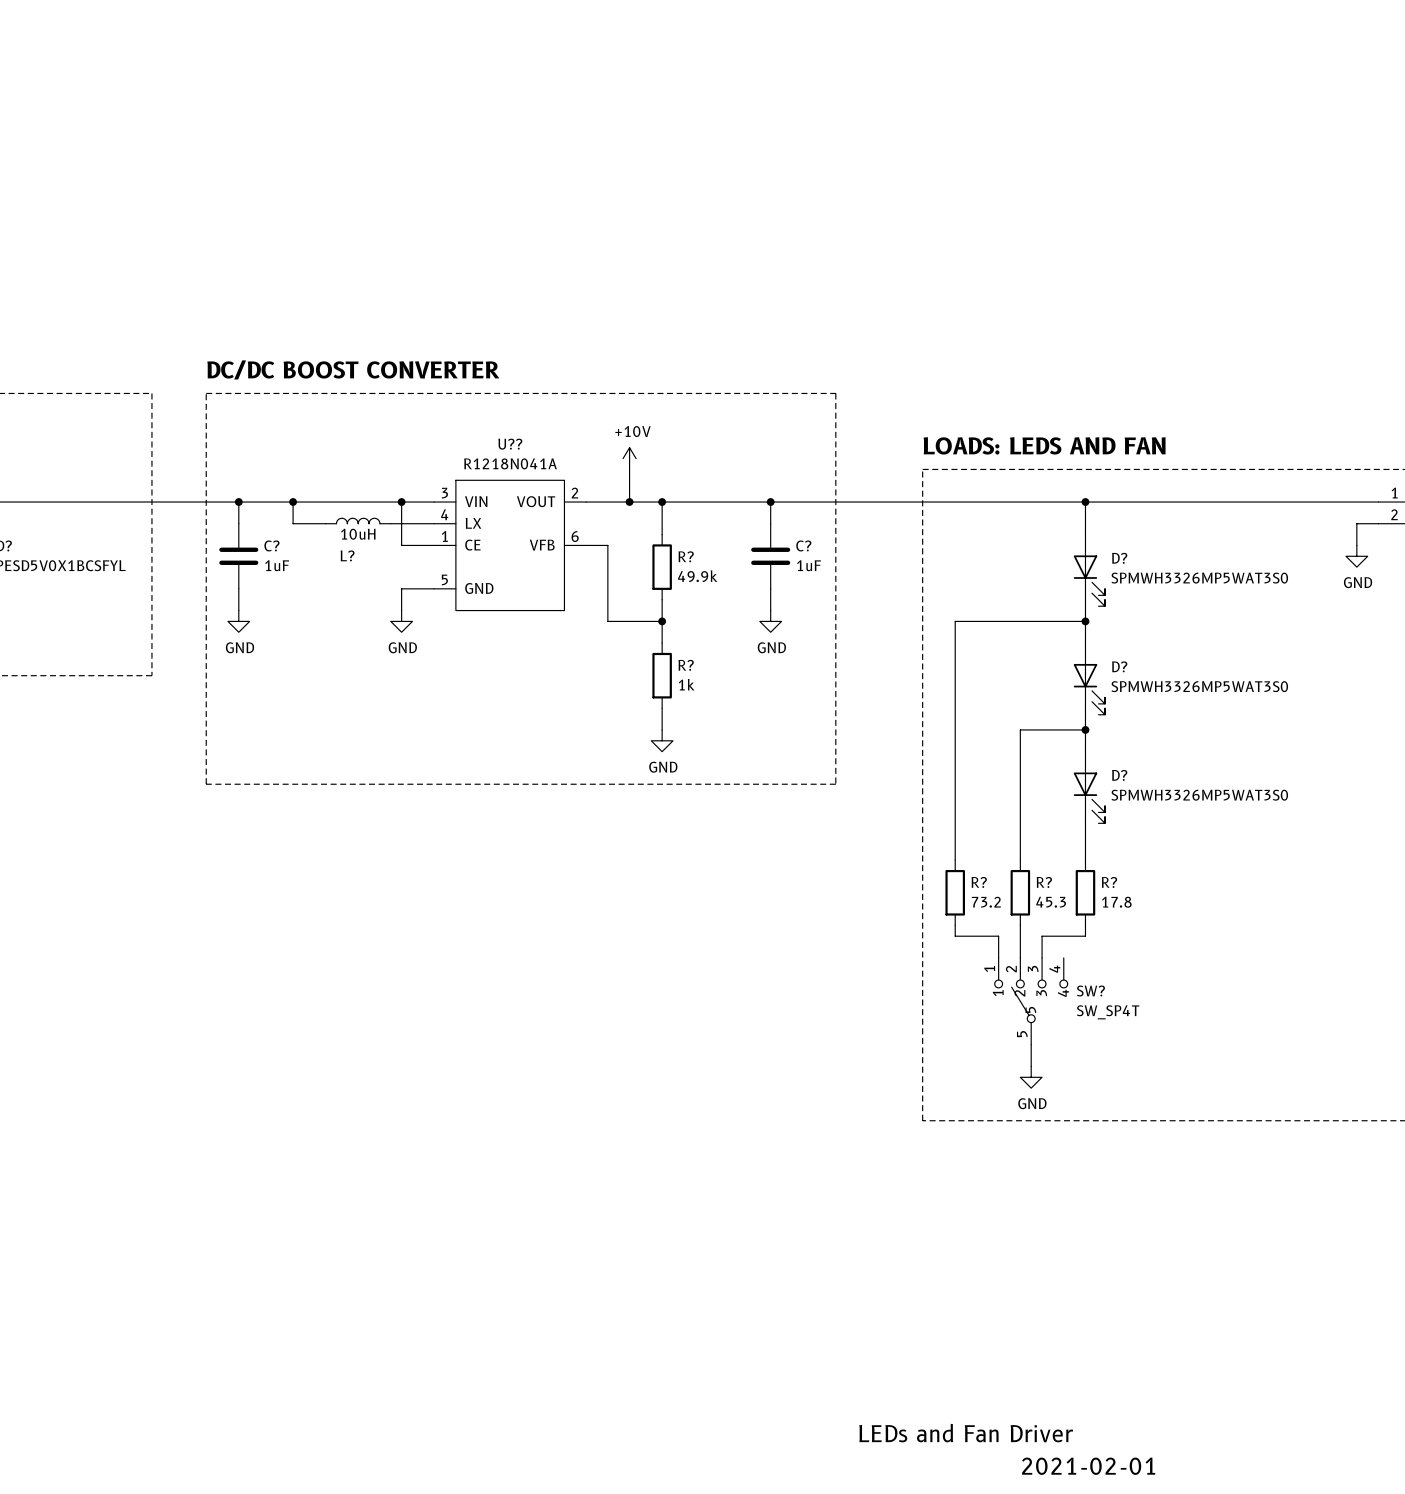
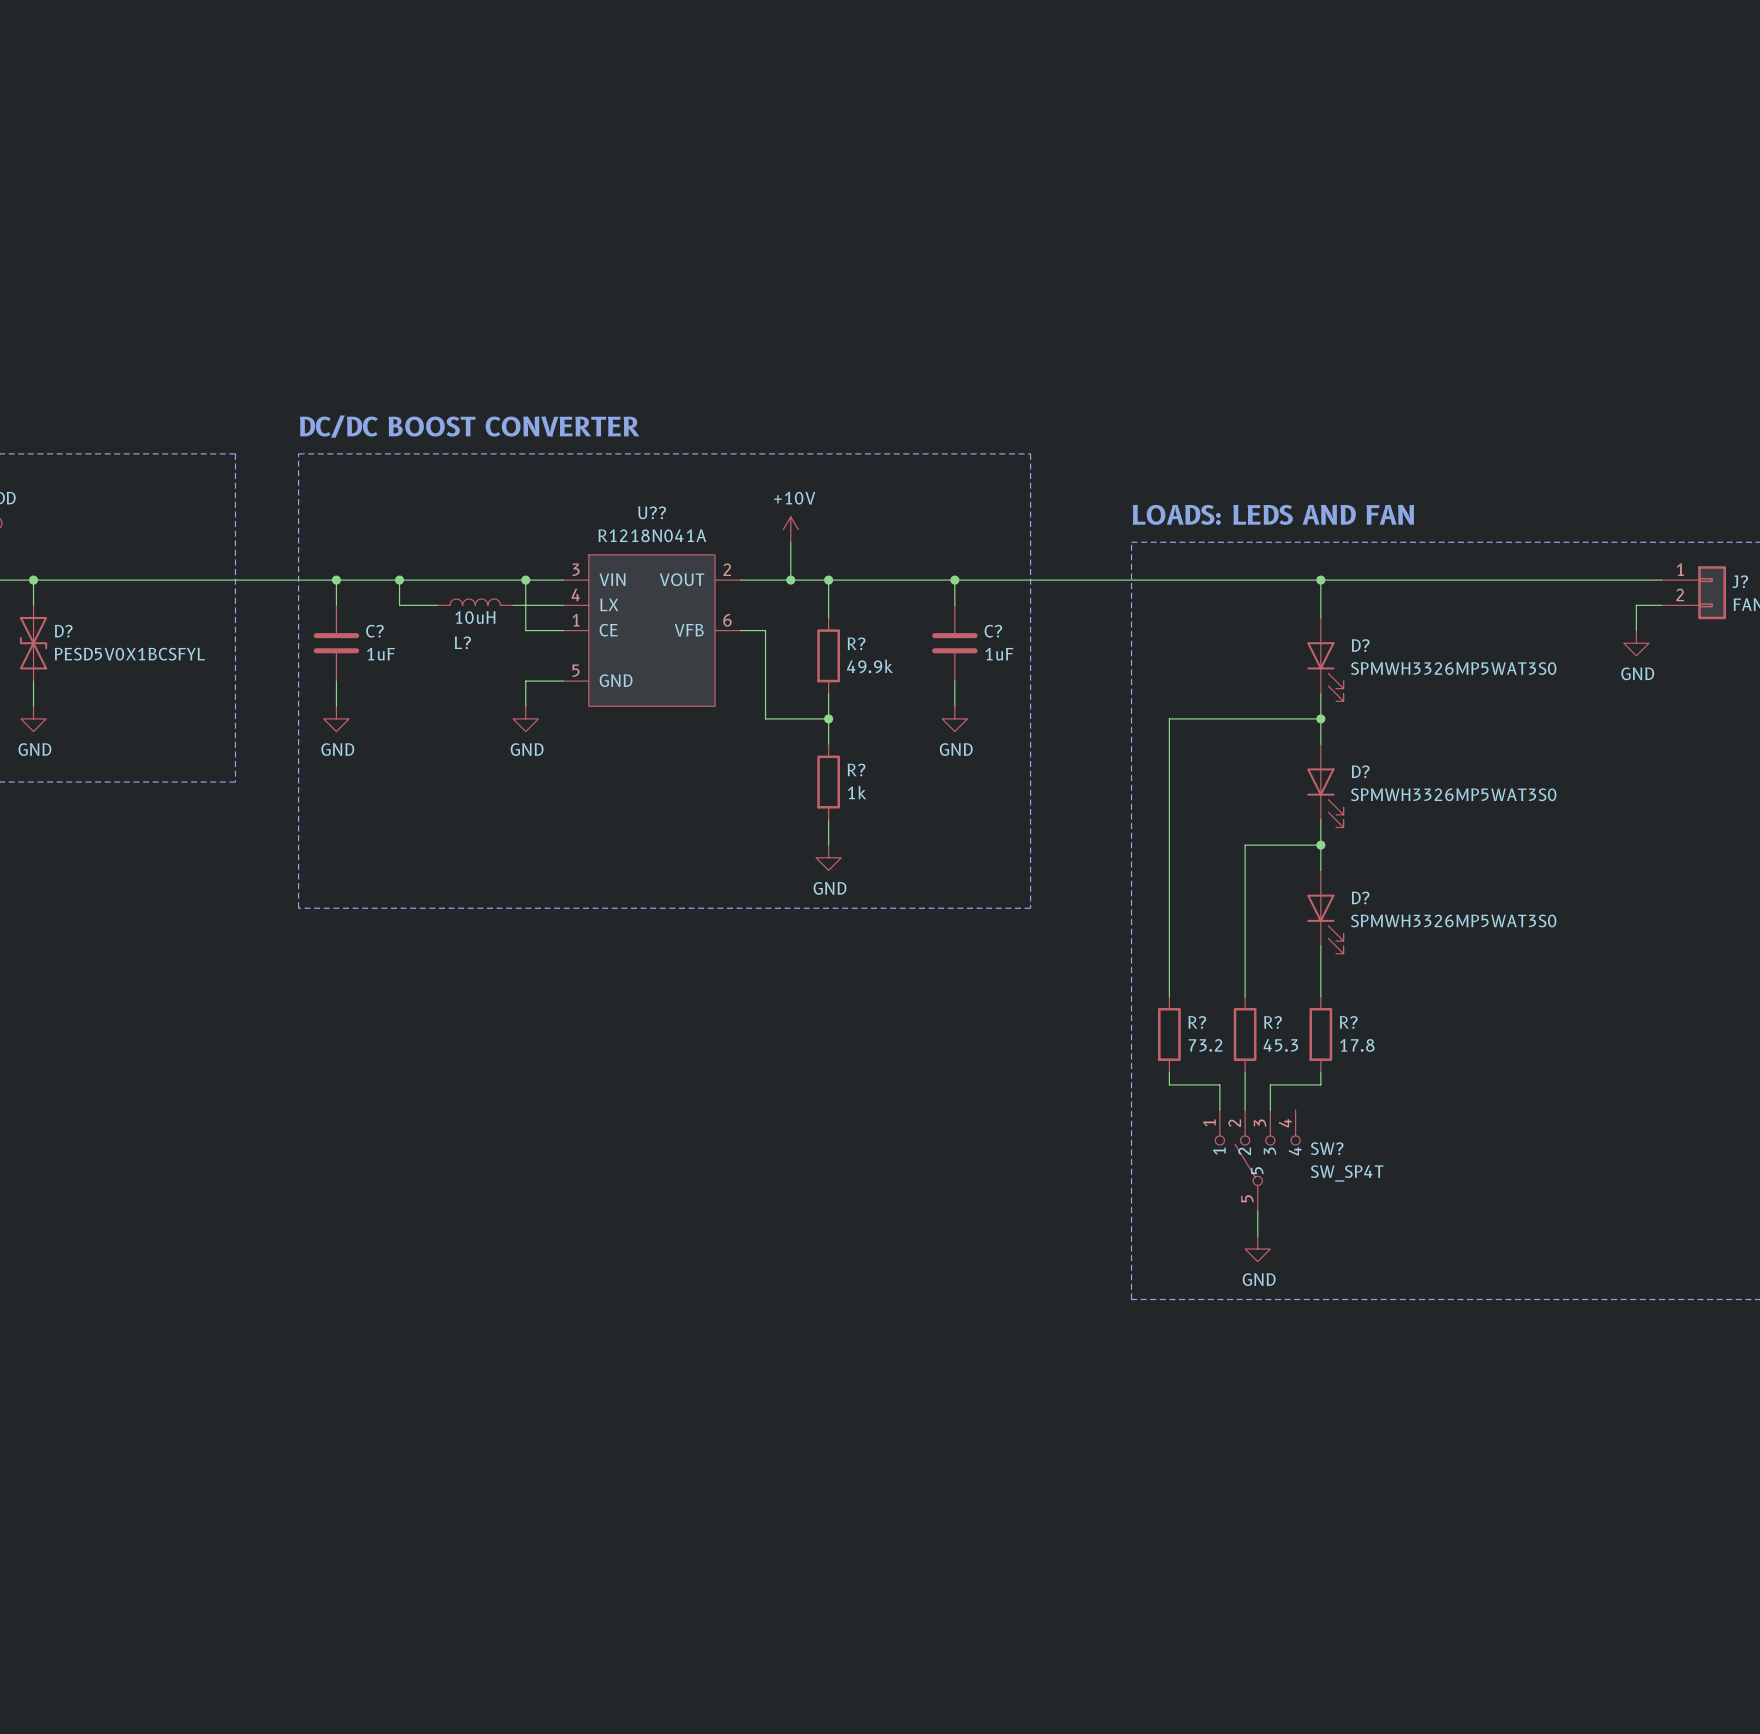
text: LEDs and Fan Driver (966, 1433) -> none
text: 2021-02-01 (1088, 1466) -> none

